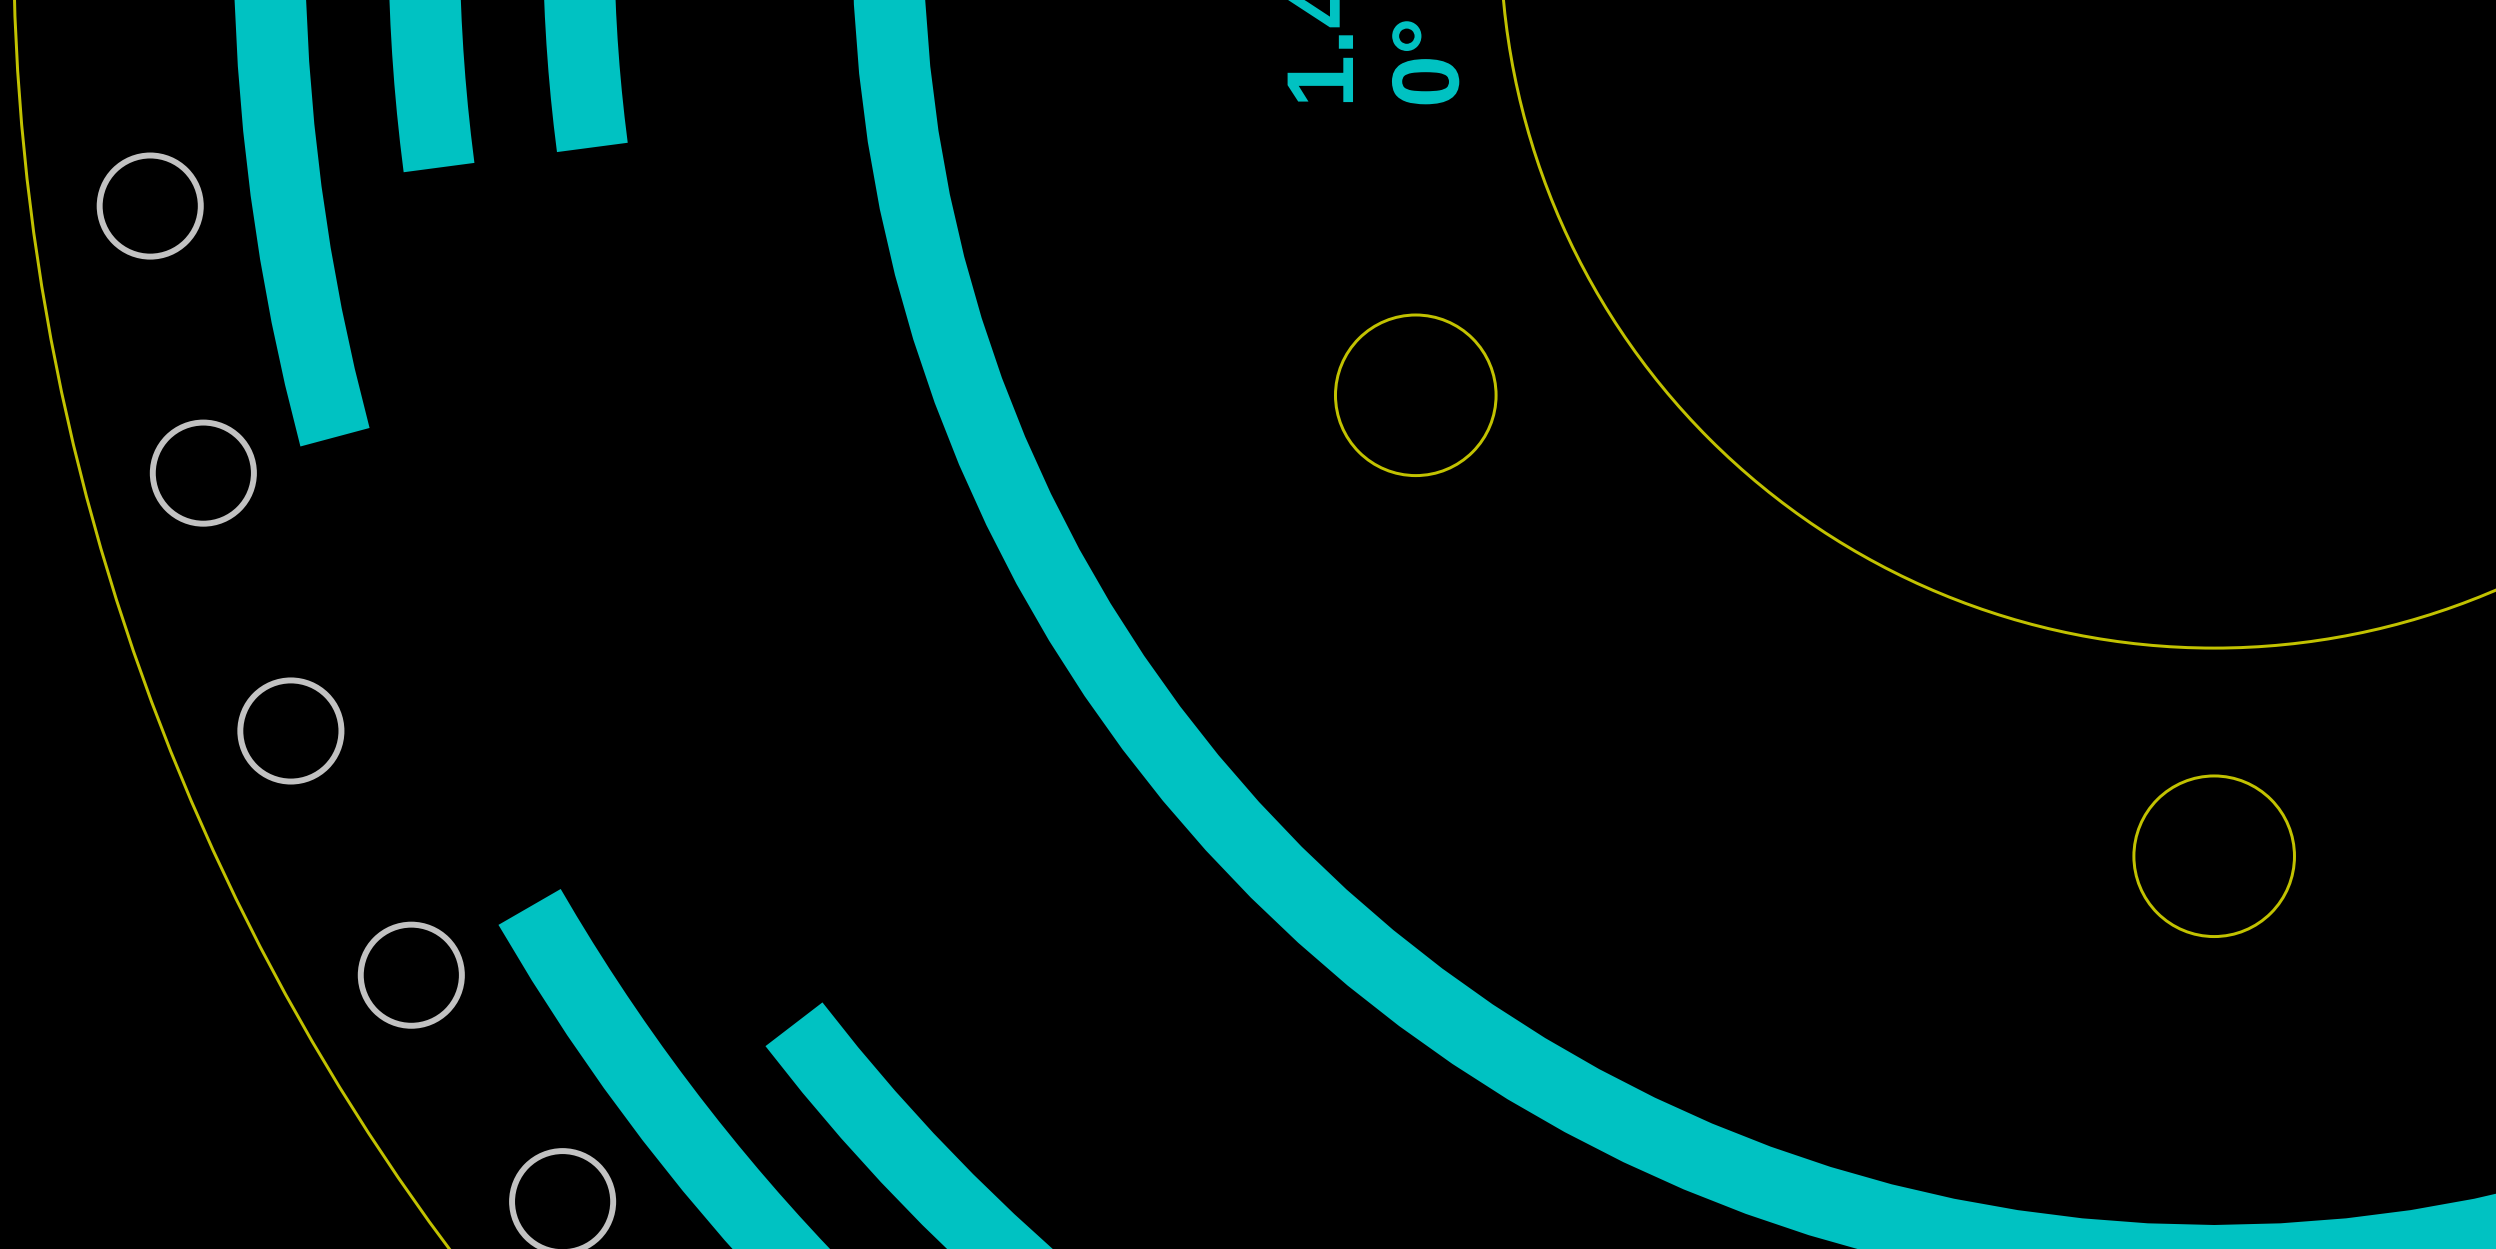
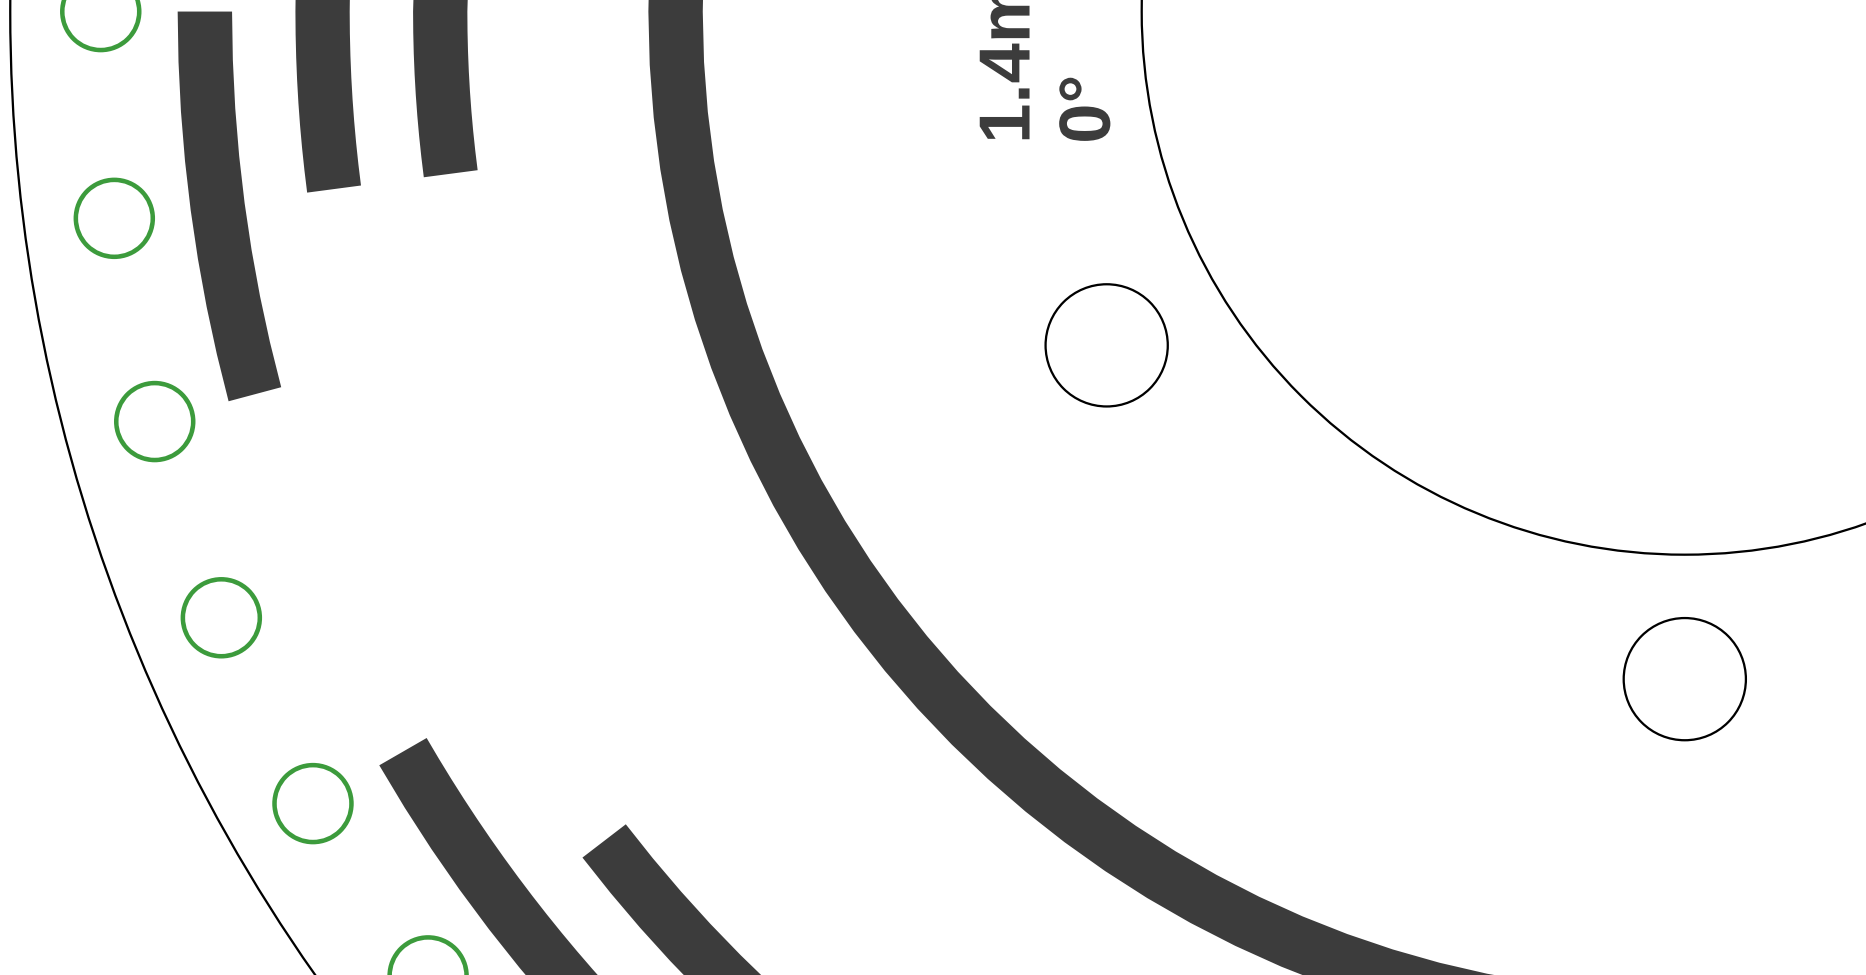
round board edge position: (1415, 395) -> (1106, 345)
round board edge position: (2214, 856) -> (1684, 679)

